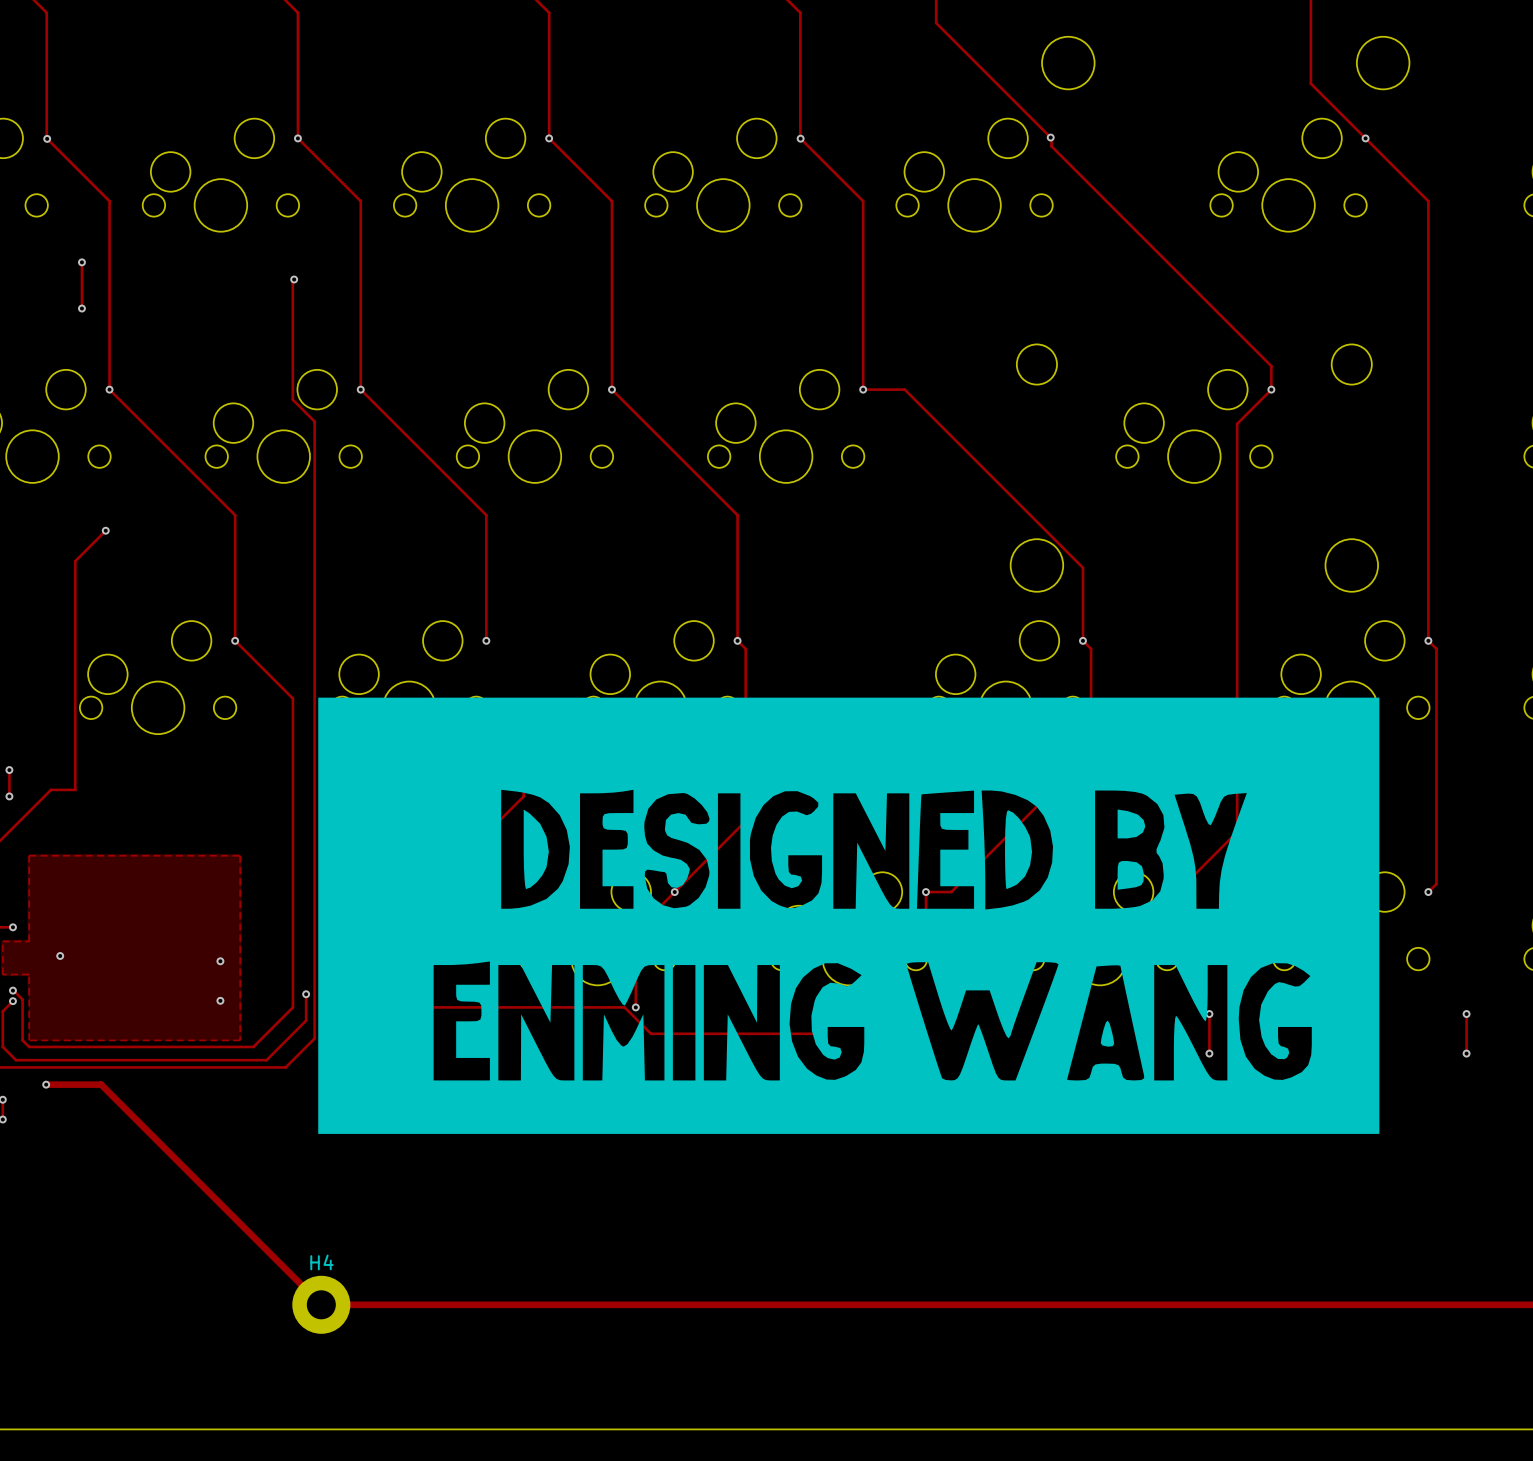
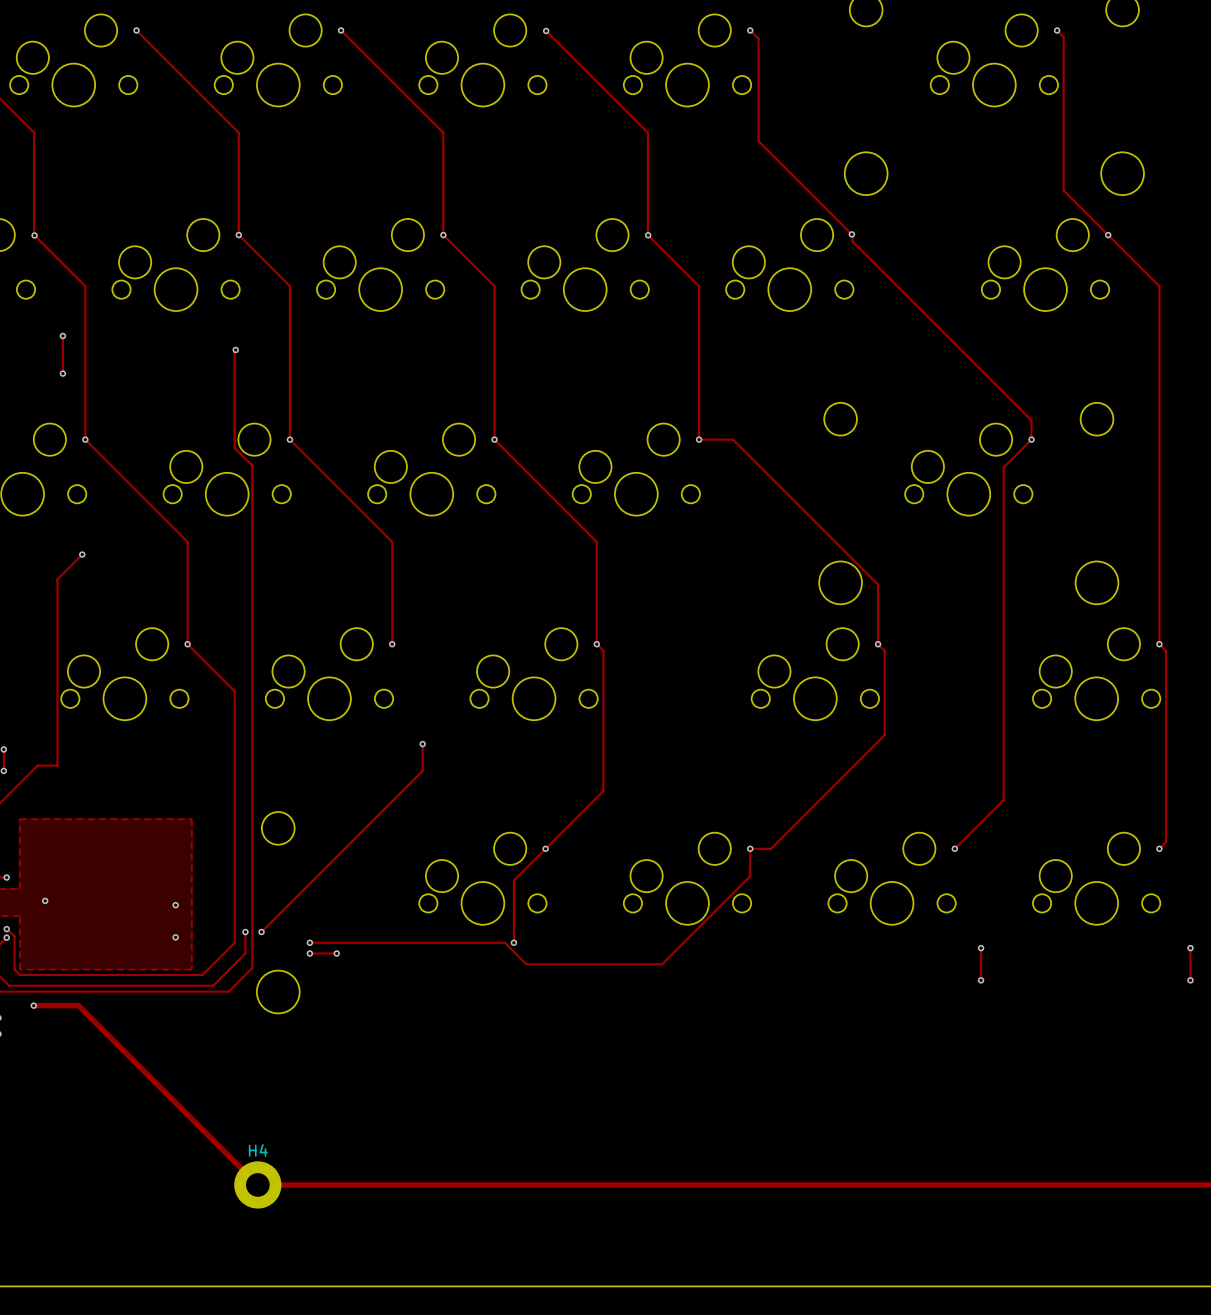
drawing: [318, 697, 1380, 1134] -> none

